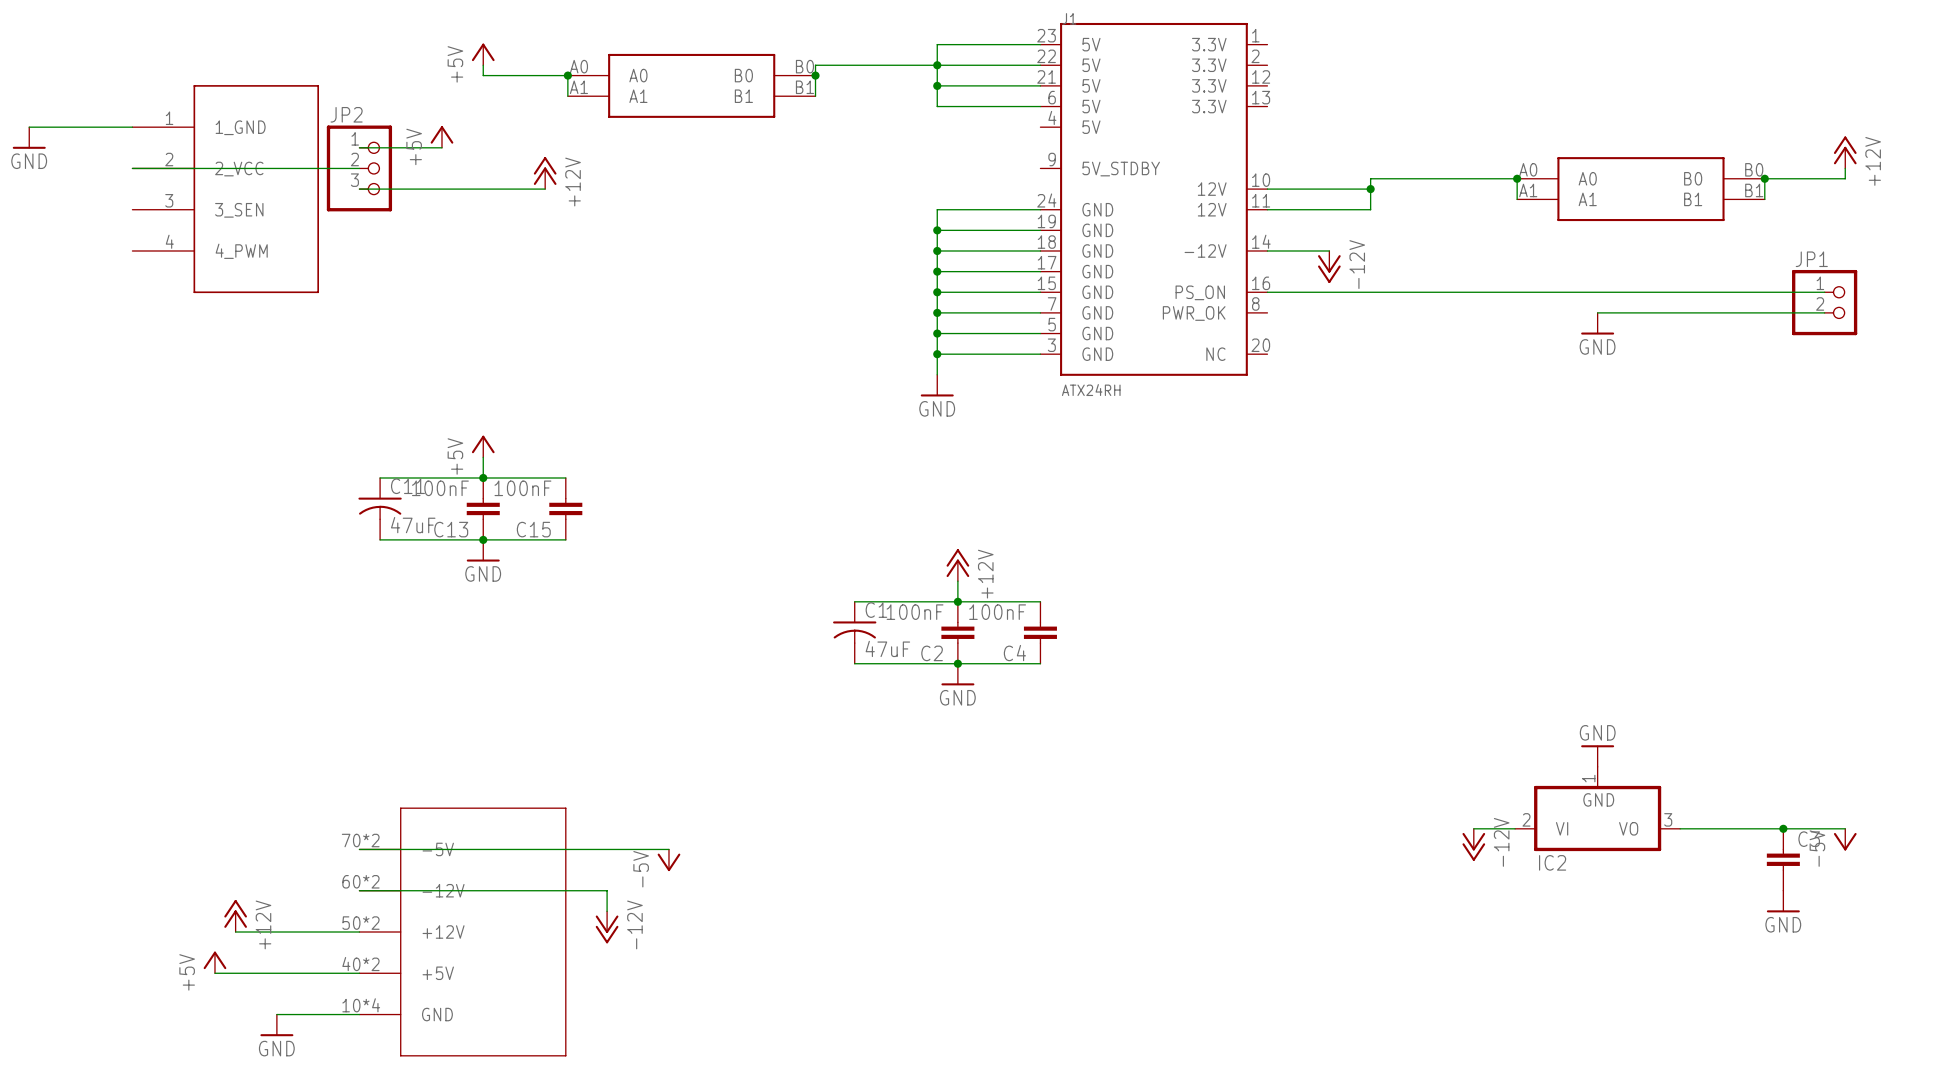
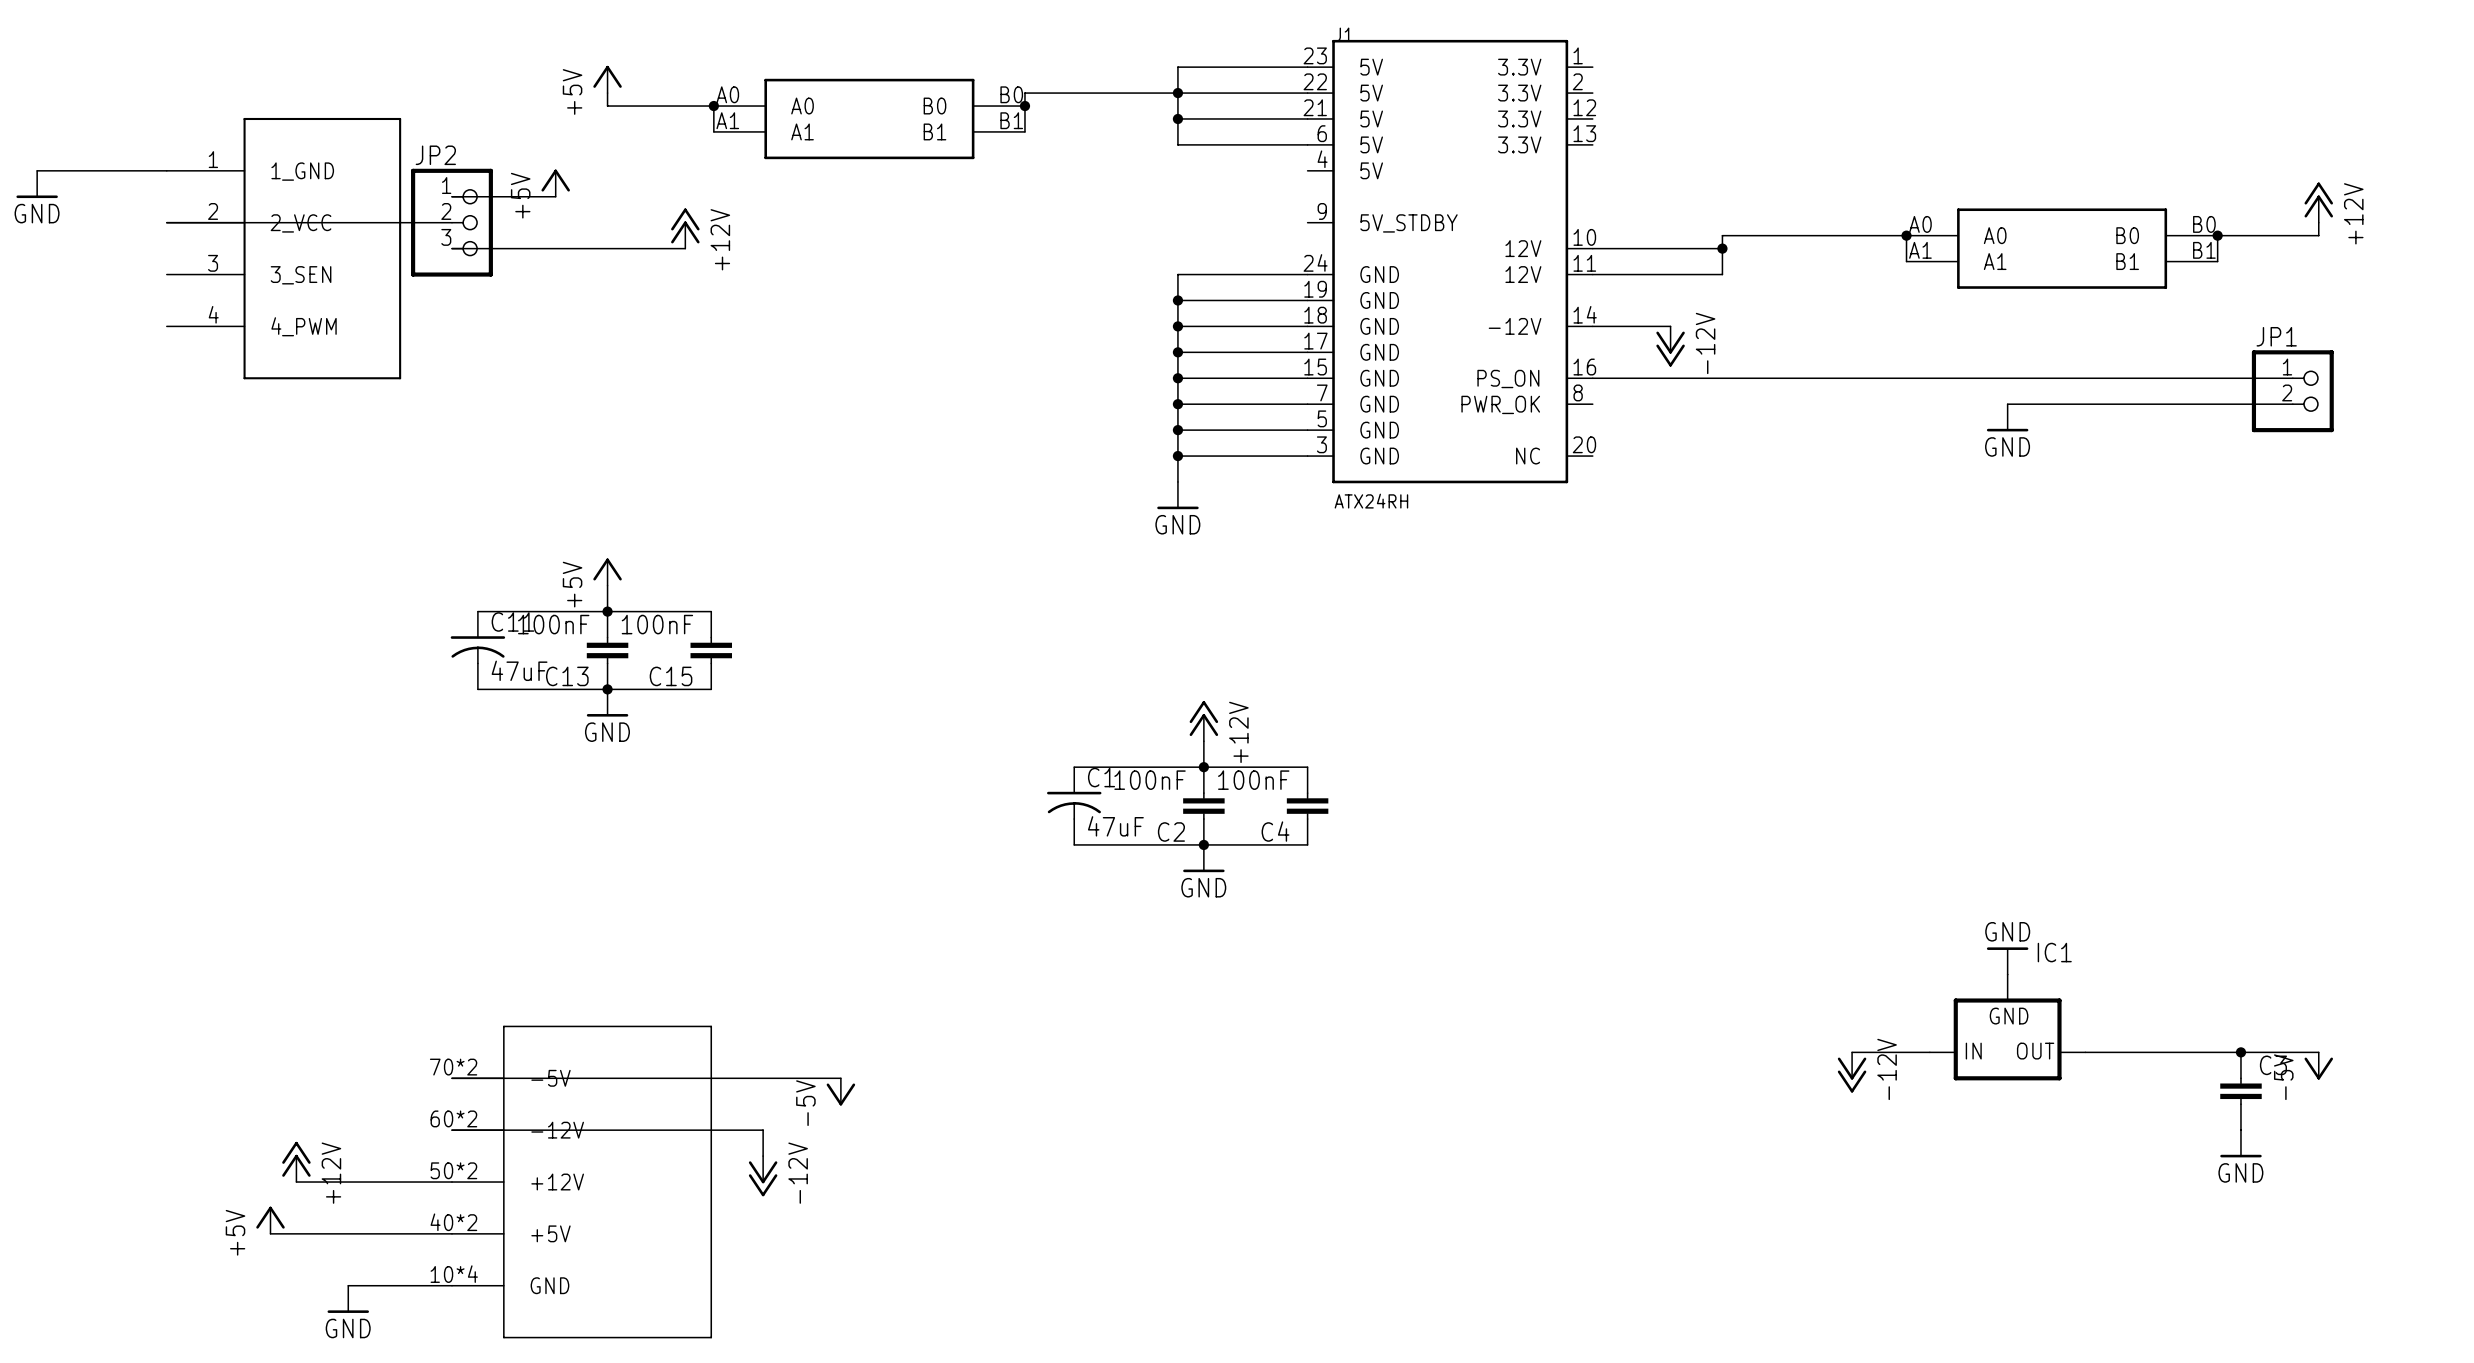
IC2: (1597, 809) -> none
IC1: none -> (2007, 1027)

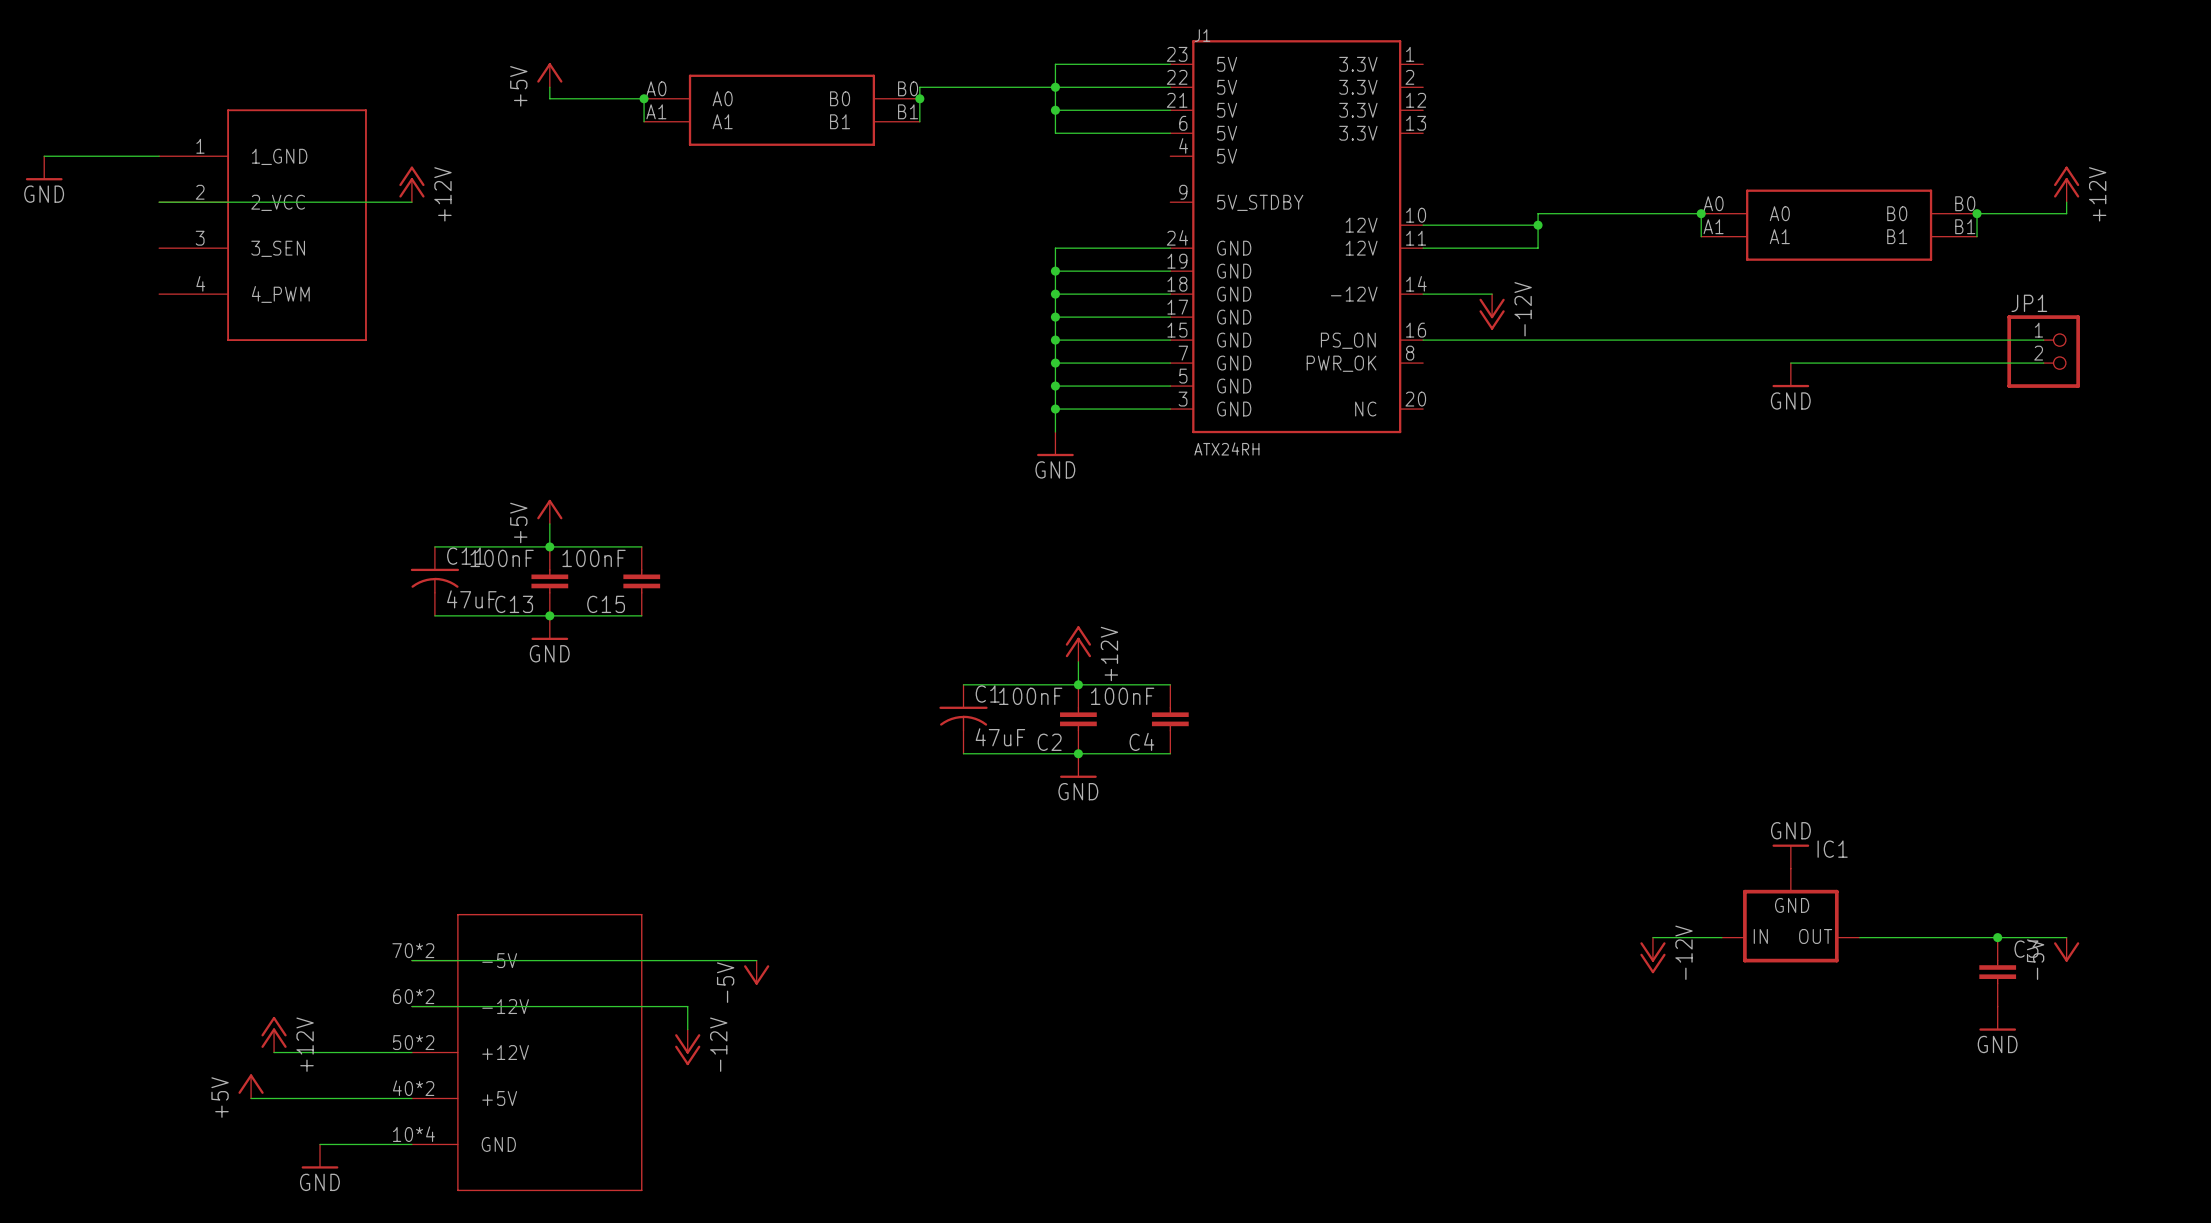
power symbol: +5V (555, 183) -> none
wire: (451, 196) (555, 196) -> none
JP2: (451, 222) -> none
power symbol position: +12V (685, 228) -> +12V (411, 184)
wire: (451, 248) (685, 248) -> none

